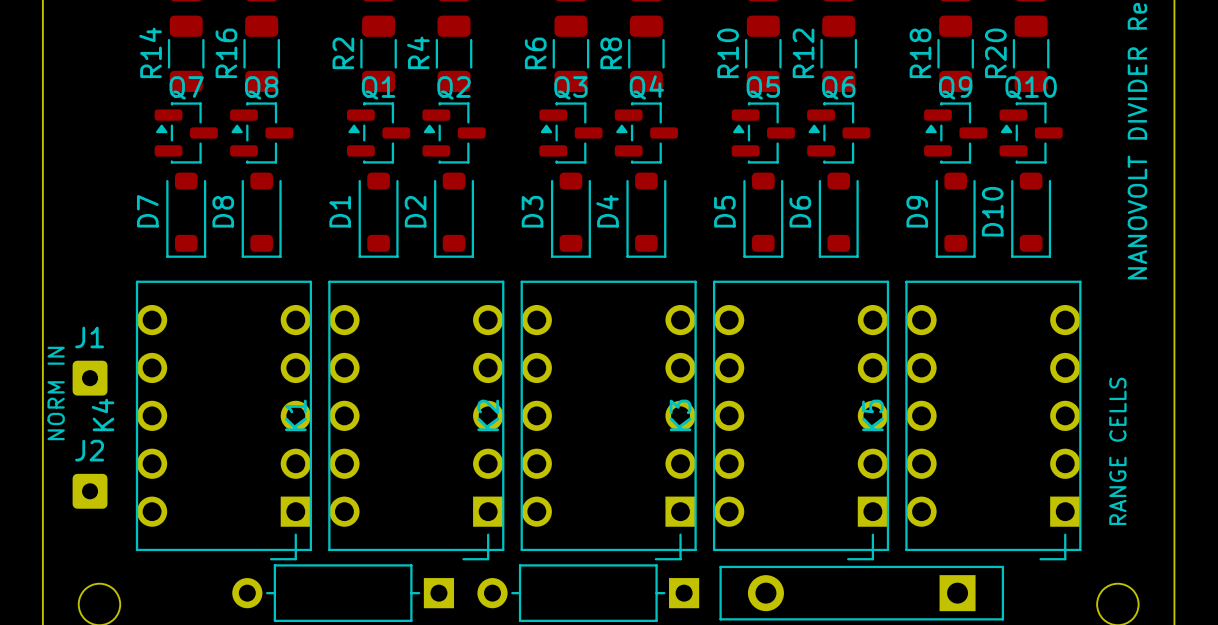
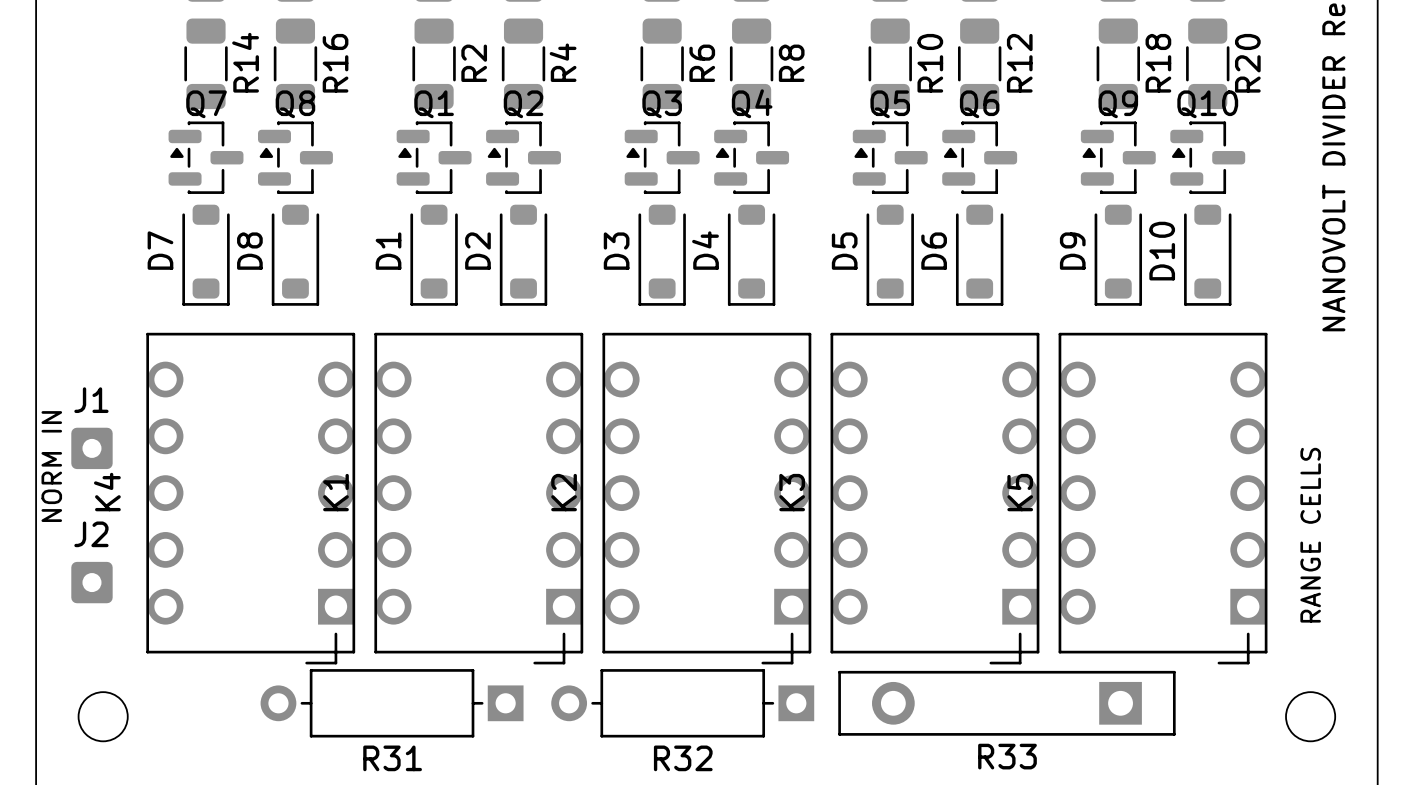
R14 name position: R14 (150, 52) -> R14 (245, 62)
R4 name position: R4 (418, 52) -> R4 (563, 62)
R16 name position: R16 (226, 53) -> R16 (335, 63)
R2 name position: R2 (343, 53) -> R2 (474, 63)
R6 name position: R6 (535, 53) -> R6 (702, 63)
R8 name position: R8 (611, 53) -> R8 (791, 63)
R10 name position: R10 (728, 53) -> R10 (930, 63)
R12 name position: R12 (803, 53) -> R12 (1019, 63)
R18 name position: R18 (920, 53) -> R18 (1158, 63)
R20 name position: R20 (995, 53) -> R20 (1247, 63)

